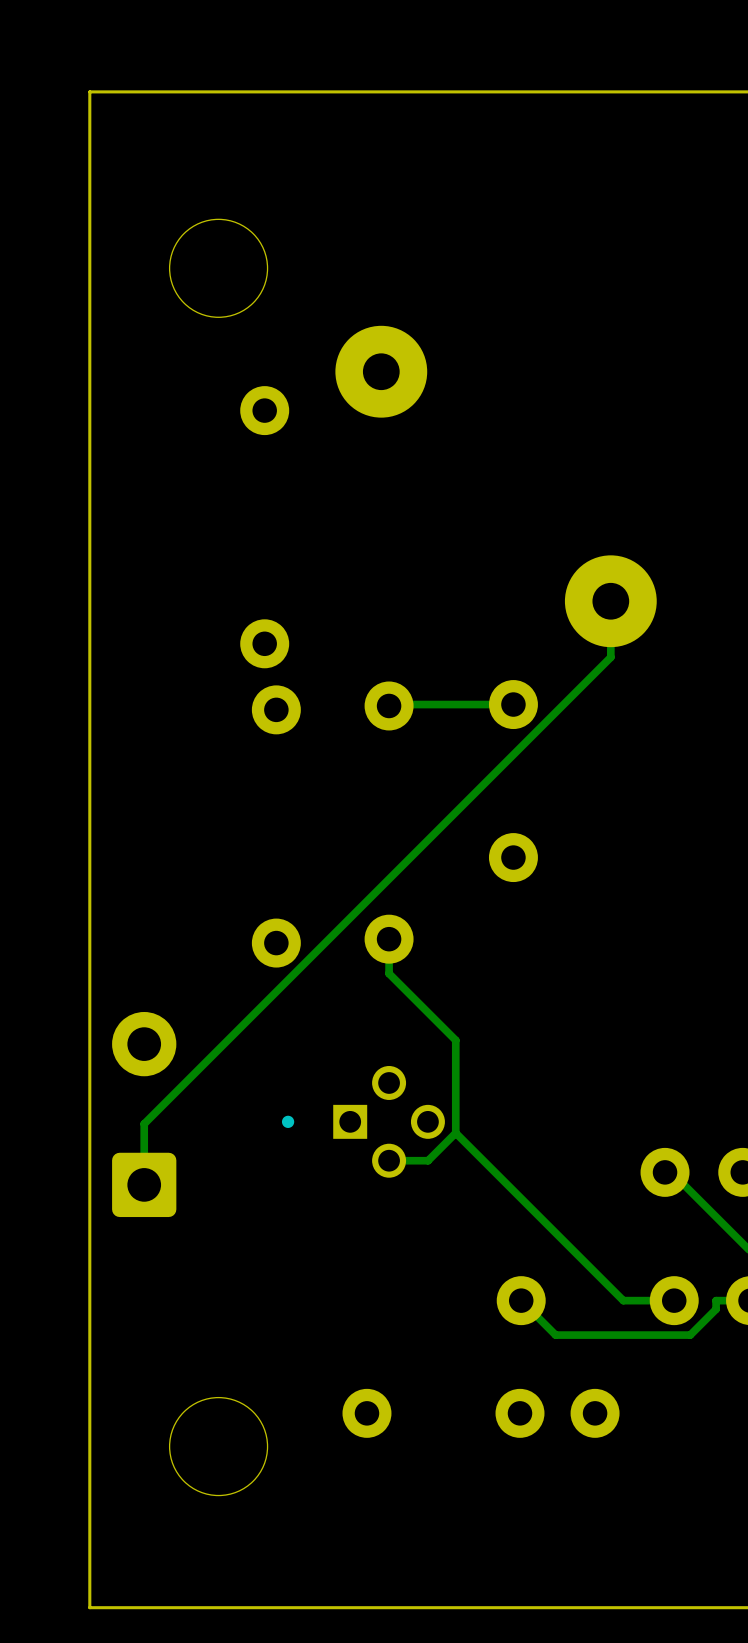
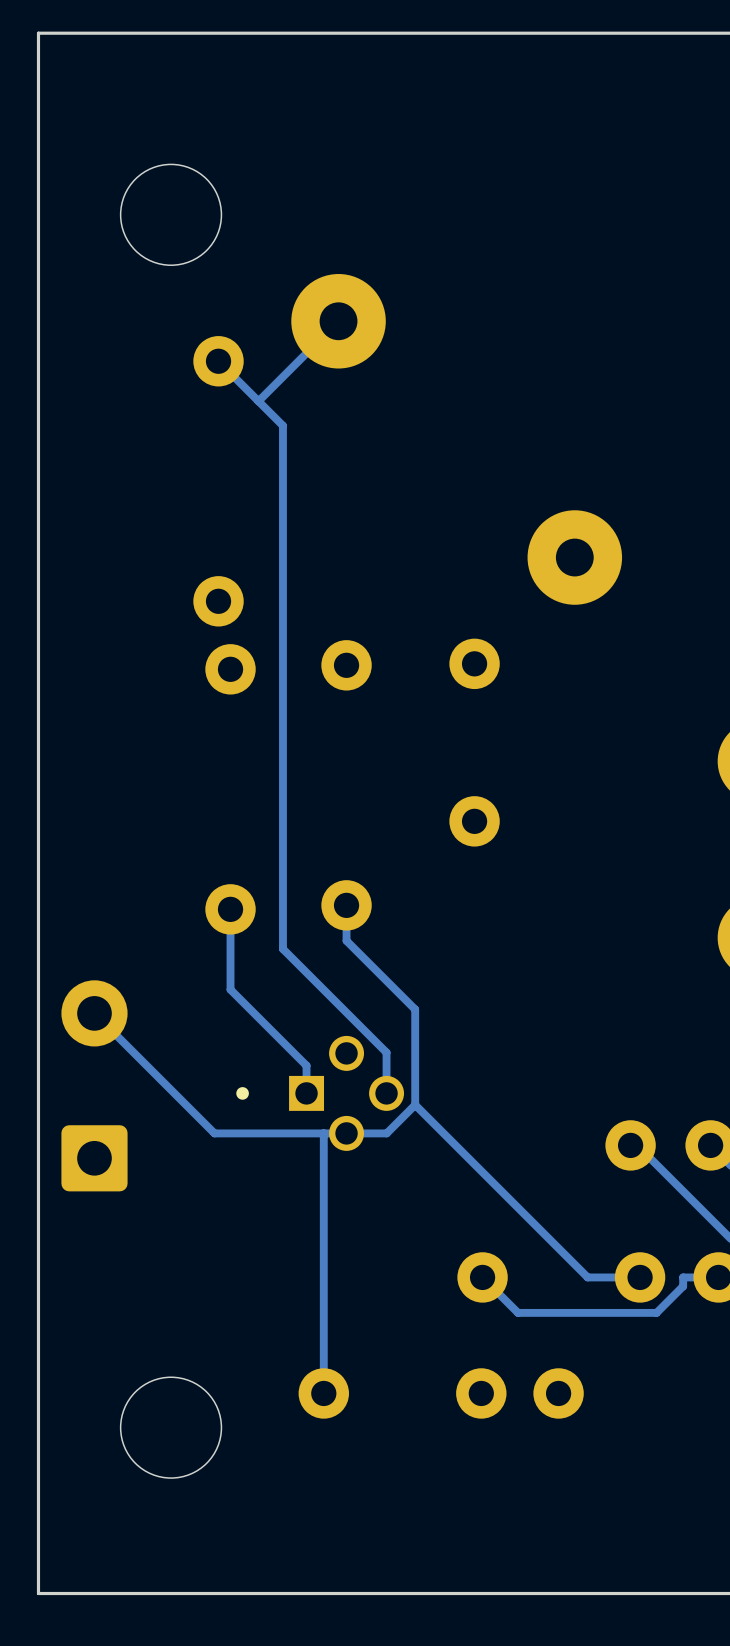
track: none -> (338, 321) (258, 401)
track: none -> (218, 361) (282, 425) (282, 949) (386, 1052) (386, 1093)
track: (610, 601) (610, 657) (144, 1123) (144, 1184) -> none
track: (513, 704) (389, 705) -> none
track: none -> (230, 909) (230, 989) (306, 1065) (306, 1093)
track: none -> (94, 1013) (214, 1133) (346, 1133)
track: none -> (323, 1133) (323, 1393)

